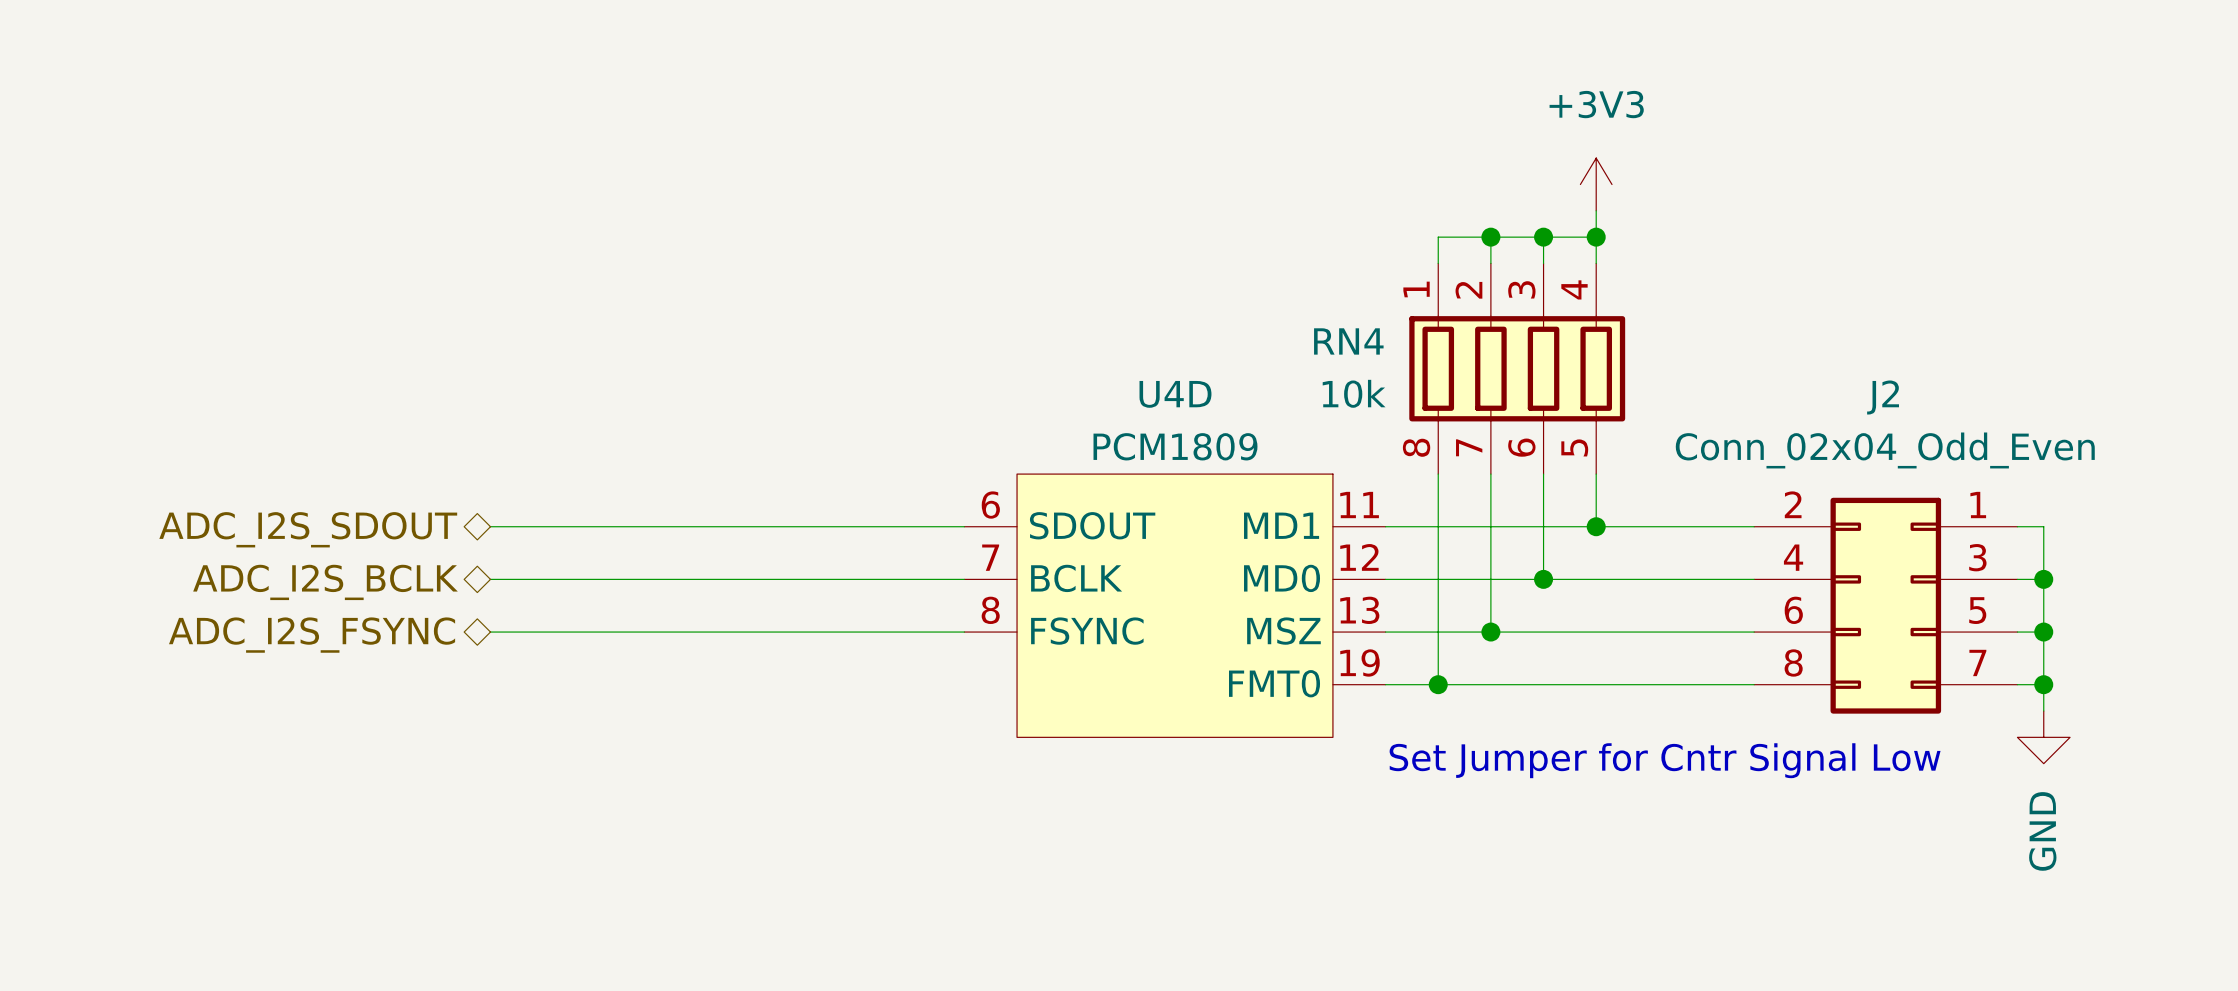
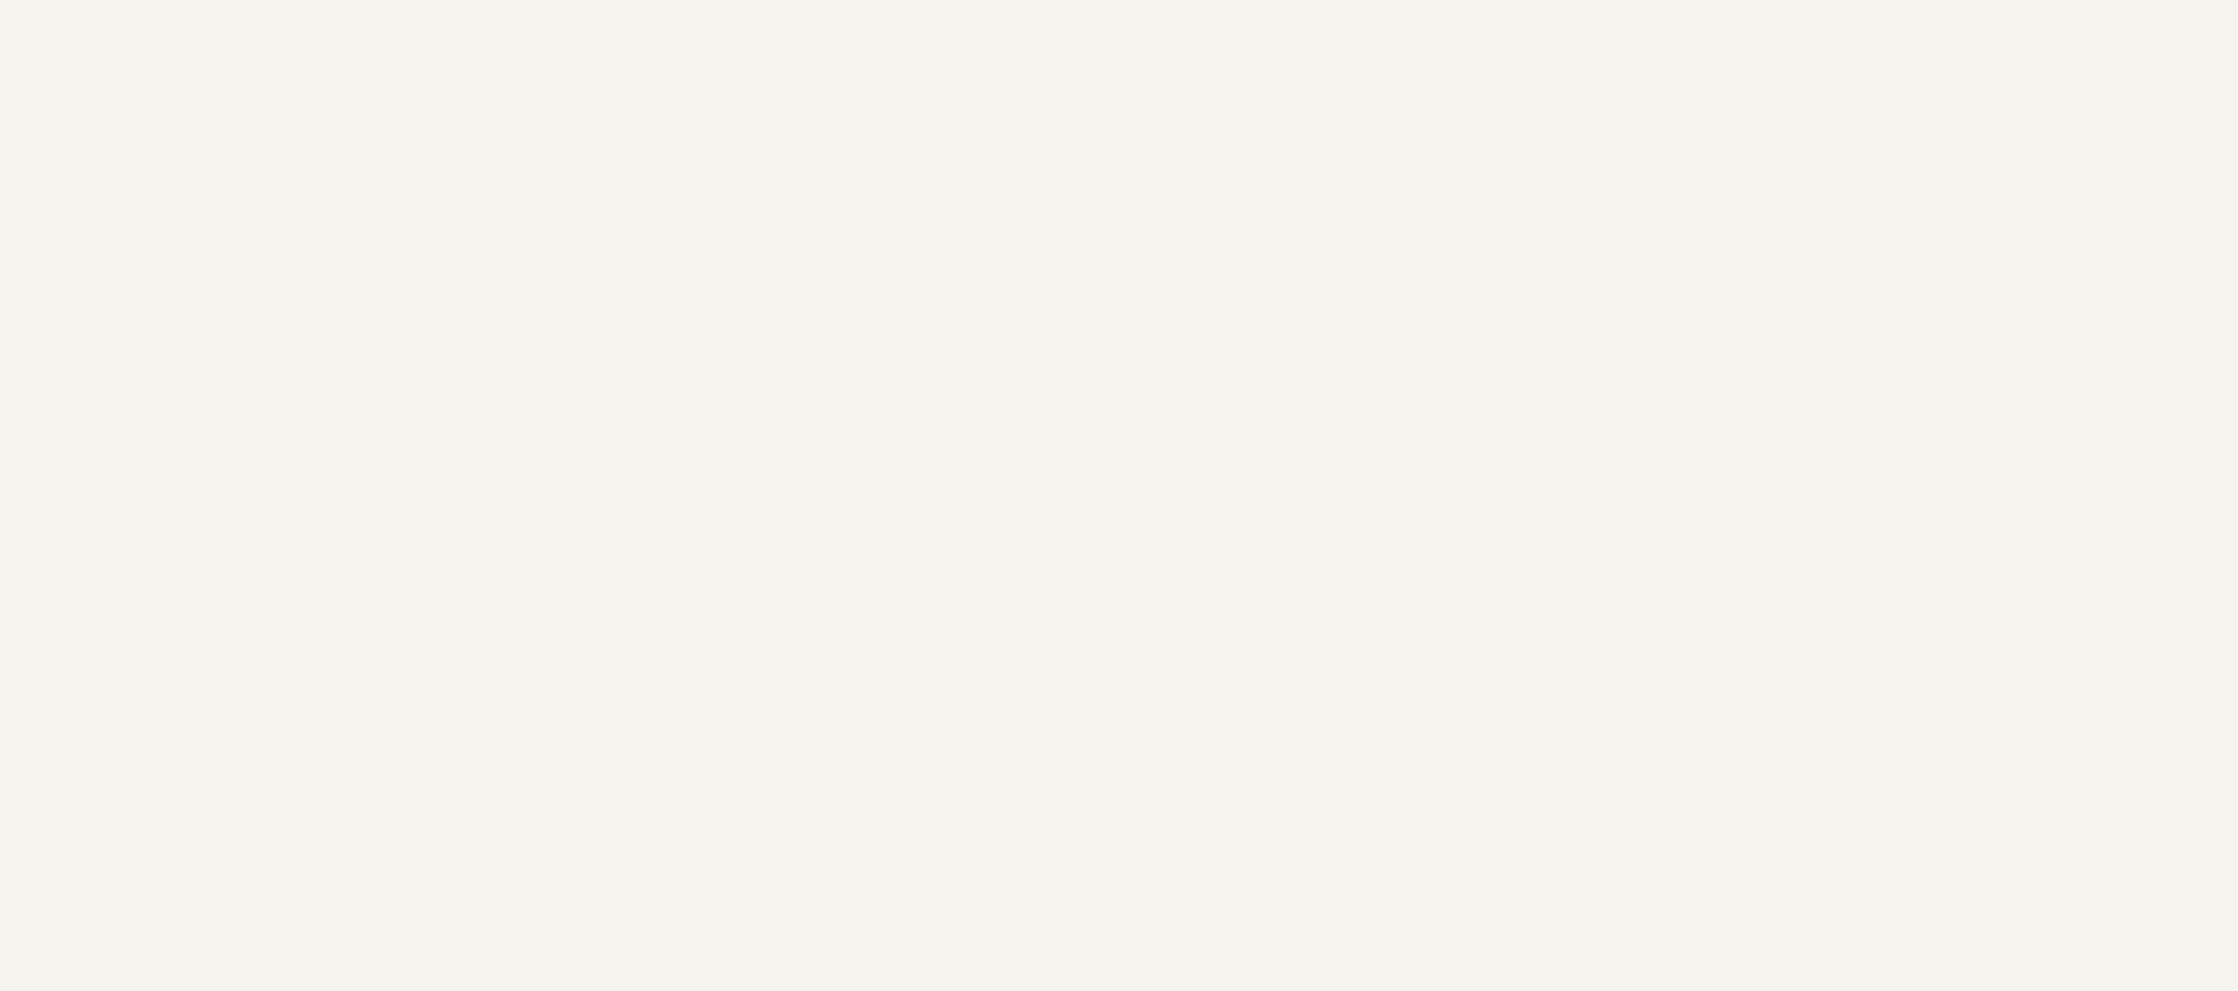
power symbol: +3V3 (1596, 184) -> none
wire: (1596, 210) (1596, 263) -> none
wire: (1490, 237) (1490, 263) -> none
junction: (1490, 237) -> none
wire: (1543, 237) (1543, 263) -> none
junction: (1543, 237) -> none
wire: (1596, 237) (1438, 237) (1438, 263) -> none
junction: (1596, 237) -> none
RN4: 10k (1517, 368) -> none
wire: (1438, 474) (1438, 684) -> none
wire: (1490, 474) (1490, 632) -> none
wire: (1543, 474) (1543, 579) -> none
wire: (1596, 474) (1596, 526) -> none
wire: (490, 526) (964, 526) -> none
wire: (1385, 526) (1754, 526) -> none
junction: (1596, 526) -> none
wire: (2017, 526) (2043, 526) (2043, 711) -> none
hierarchical label: ADC_I2S_SDOUT (308, 529) -> none
wire: (490, 579) (964, 579) -> none
wire: (1385, 579) (1754, 579) -> none
junction: (1543, 579) -> none
wire: (2017, 579) (2043, 579) -> none
junction: (2043, 579) -> none
hierarchical label: ADC_I2S_BCLK (325, 582) -> none
U4D: PCM1809 (1174, 605) -> none
J2: Conn_02x04_Odd_Even (1885, 605) -> none
wire: (490, 632) (964, 632) -> none
wire: (1385, 632) (1754, 632) -> none
junction: (1490, 632) -> none
wire: (2017, 632) (2043, 632) -> none
junction: (2043, 632) -> none
hierarchical label: ADC_I2S_FSYNC (312, 635) -> none
wire: (1385, 684) (1754, 684) -> none
junction: (1438, 684) -> none
wire: (2017, 684) (2043, 684) -> none
junction: (2043, 684) -> none
power symbol: GND (2043, 737) -> none
text: Set Jumper for Cntr Signal Low (1665, 760) -> none

